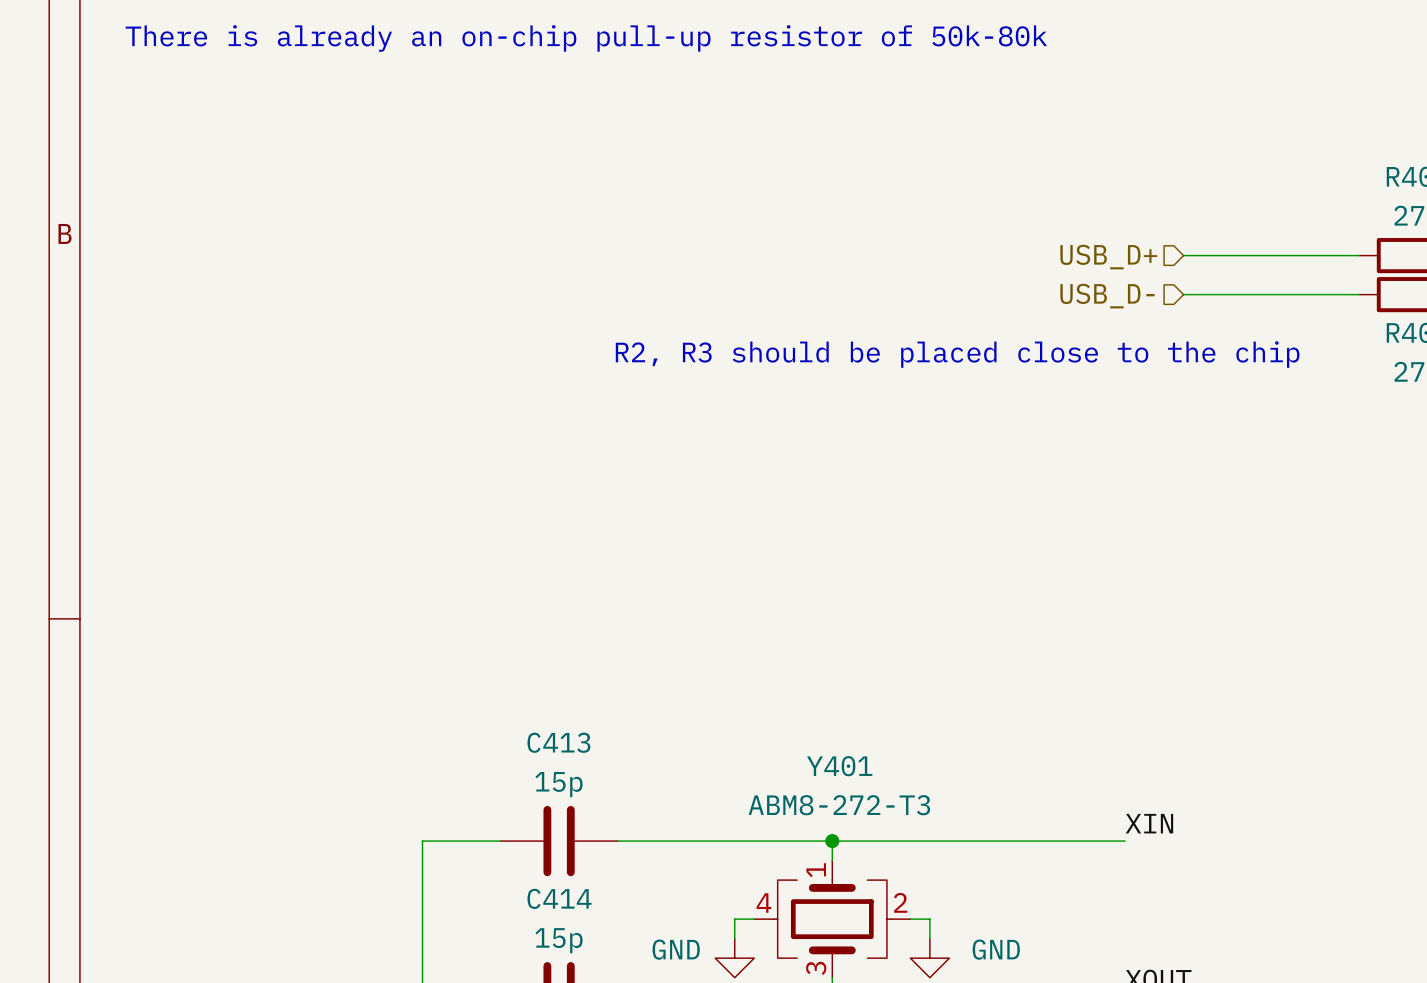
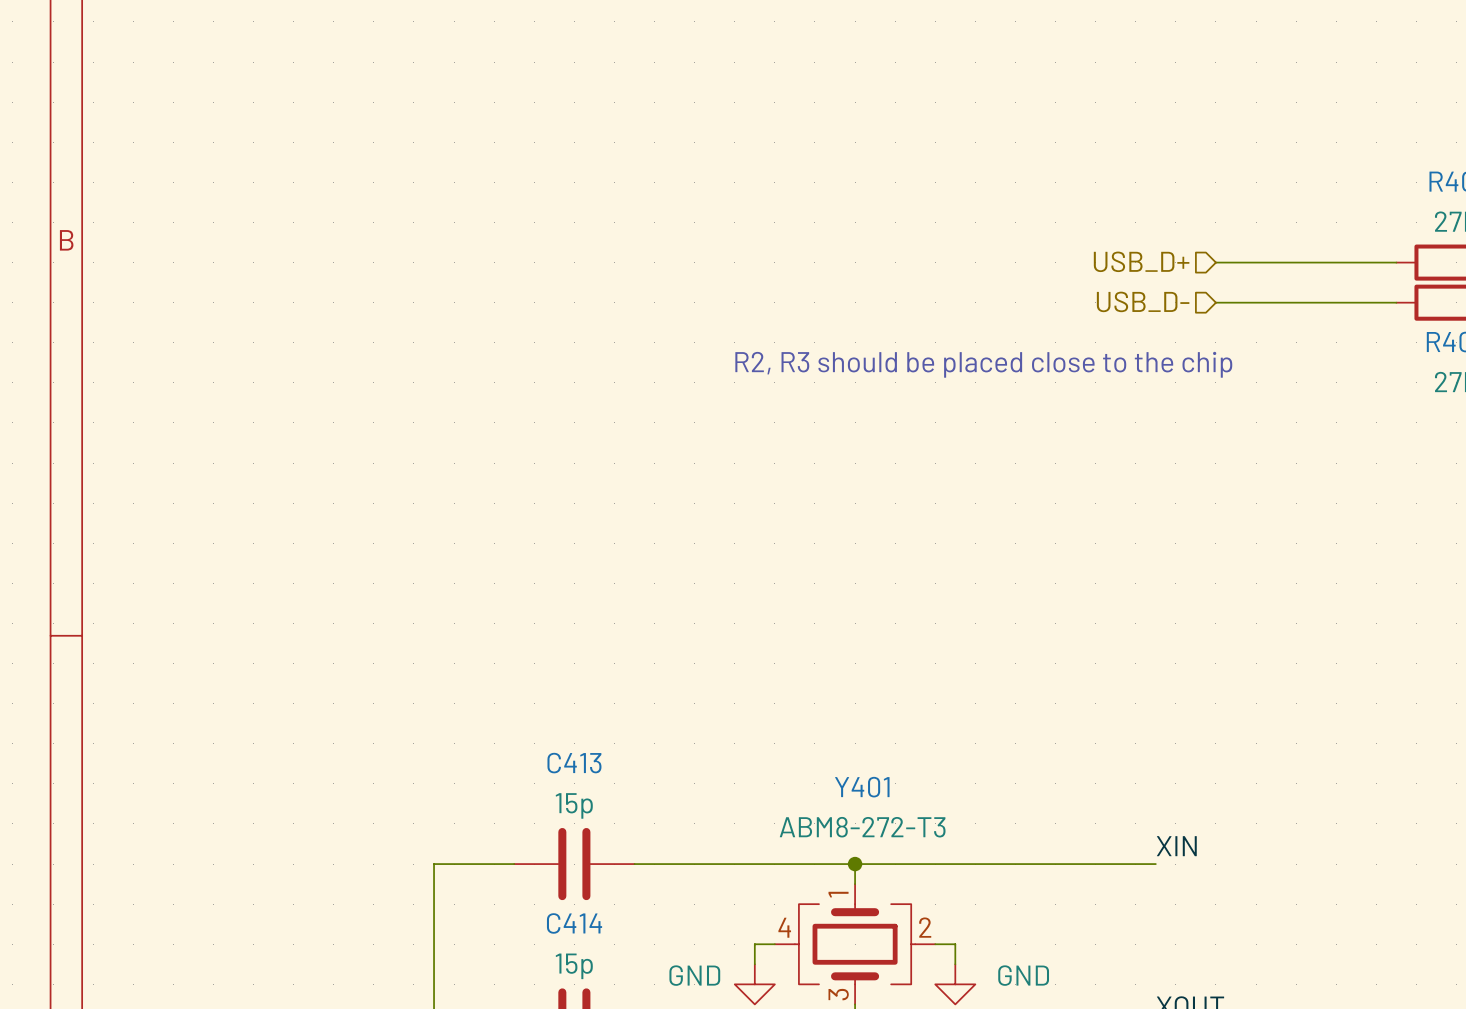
text: There is already an on-chip pull-up resistor of 50k-80k (586, 38) -> none

